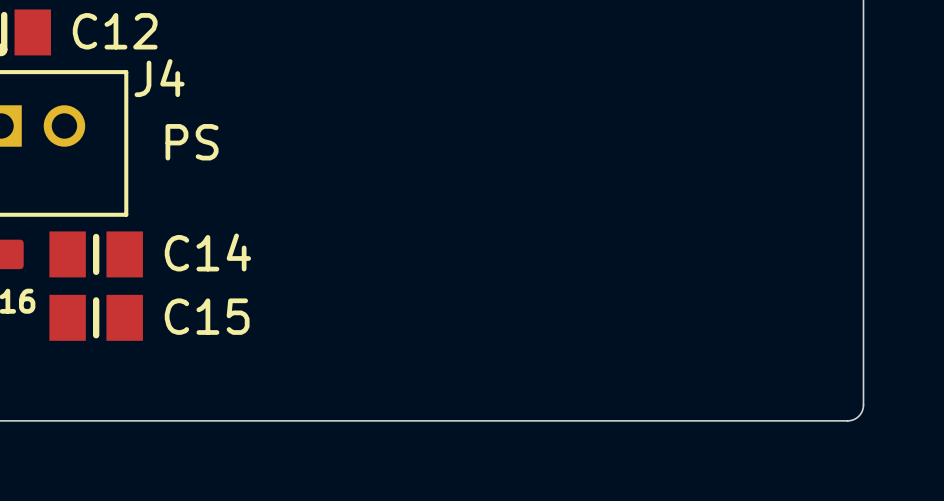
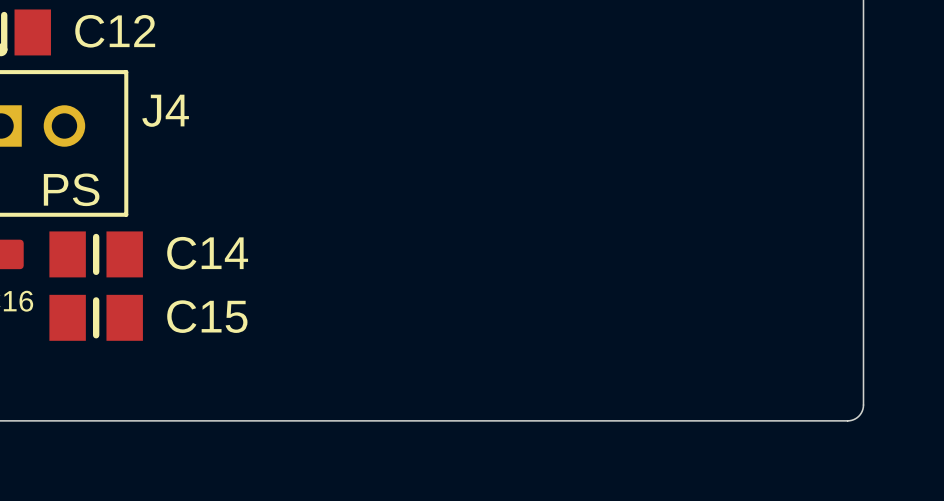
J4 name position: J4 (159, 78) -> J4 (165, 110)
text position: PS (192, 142) -> PS (71, 189)

